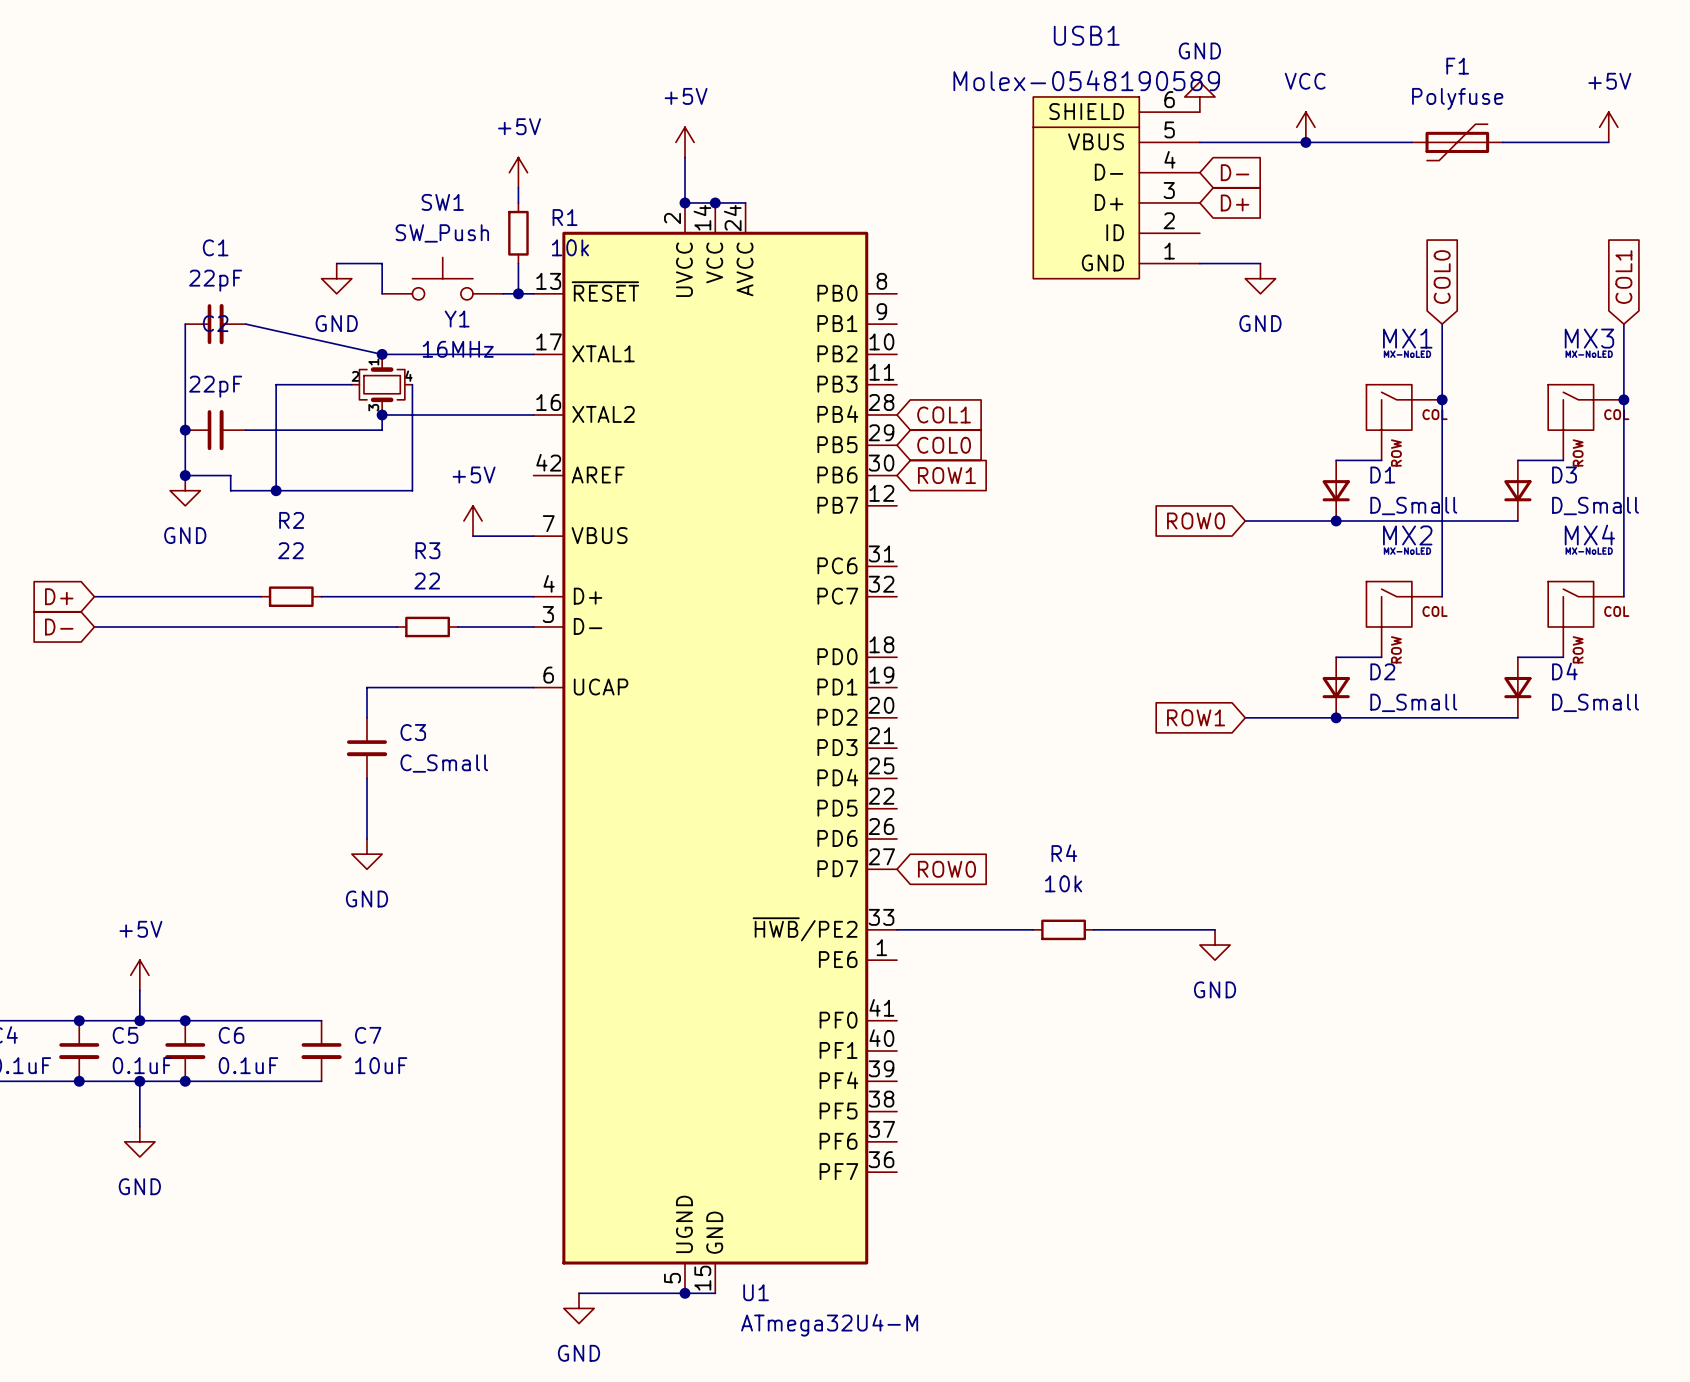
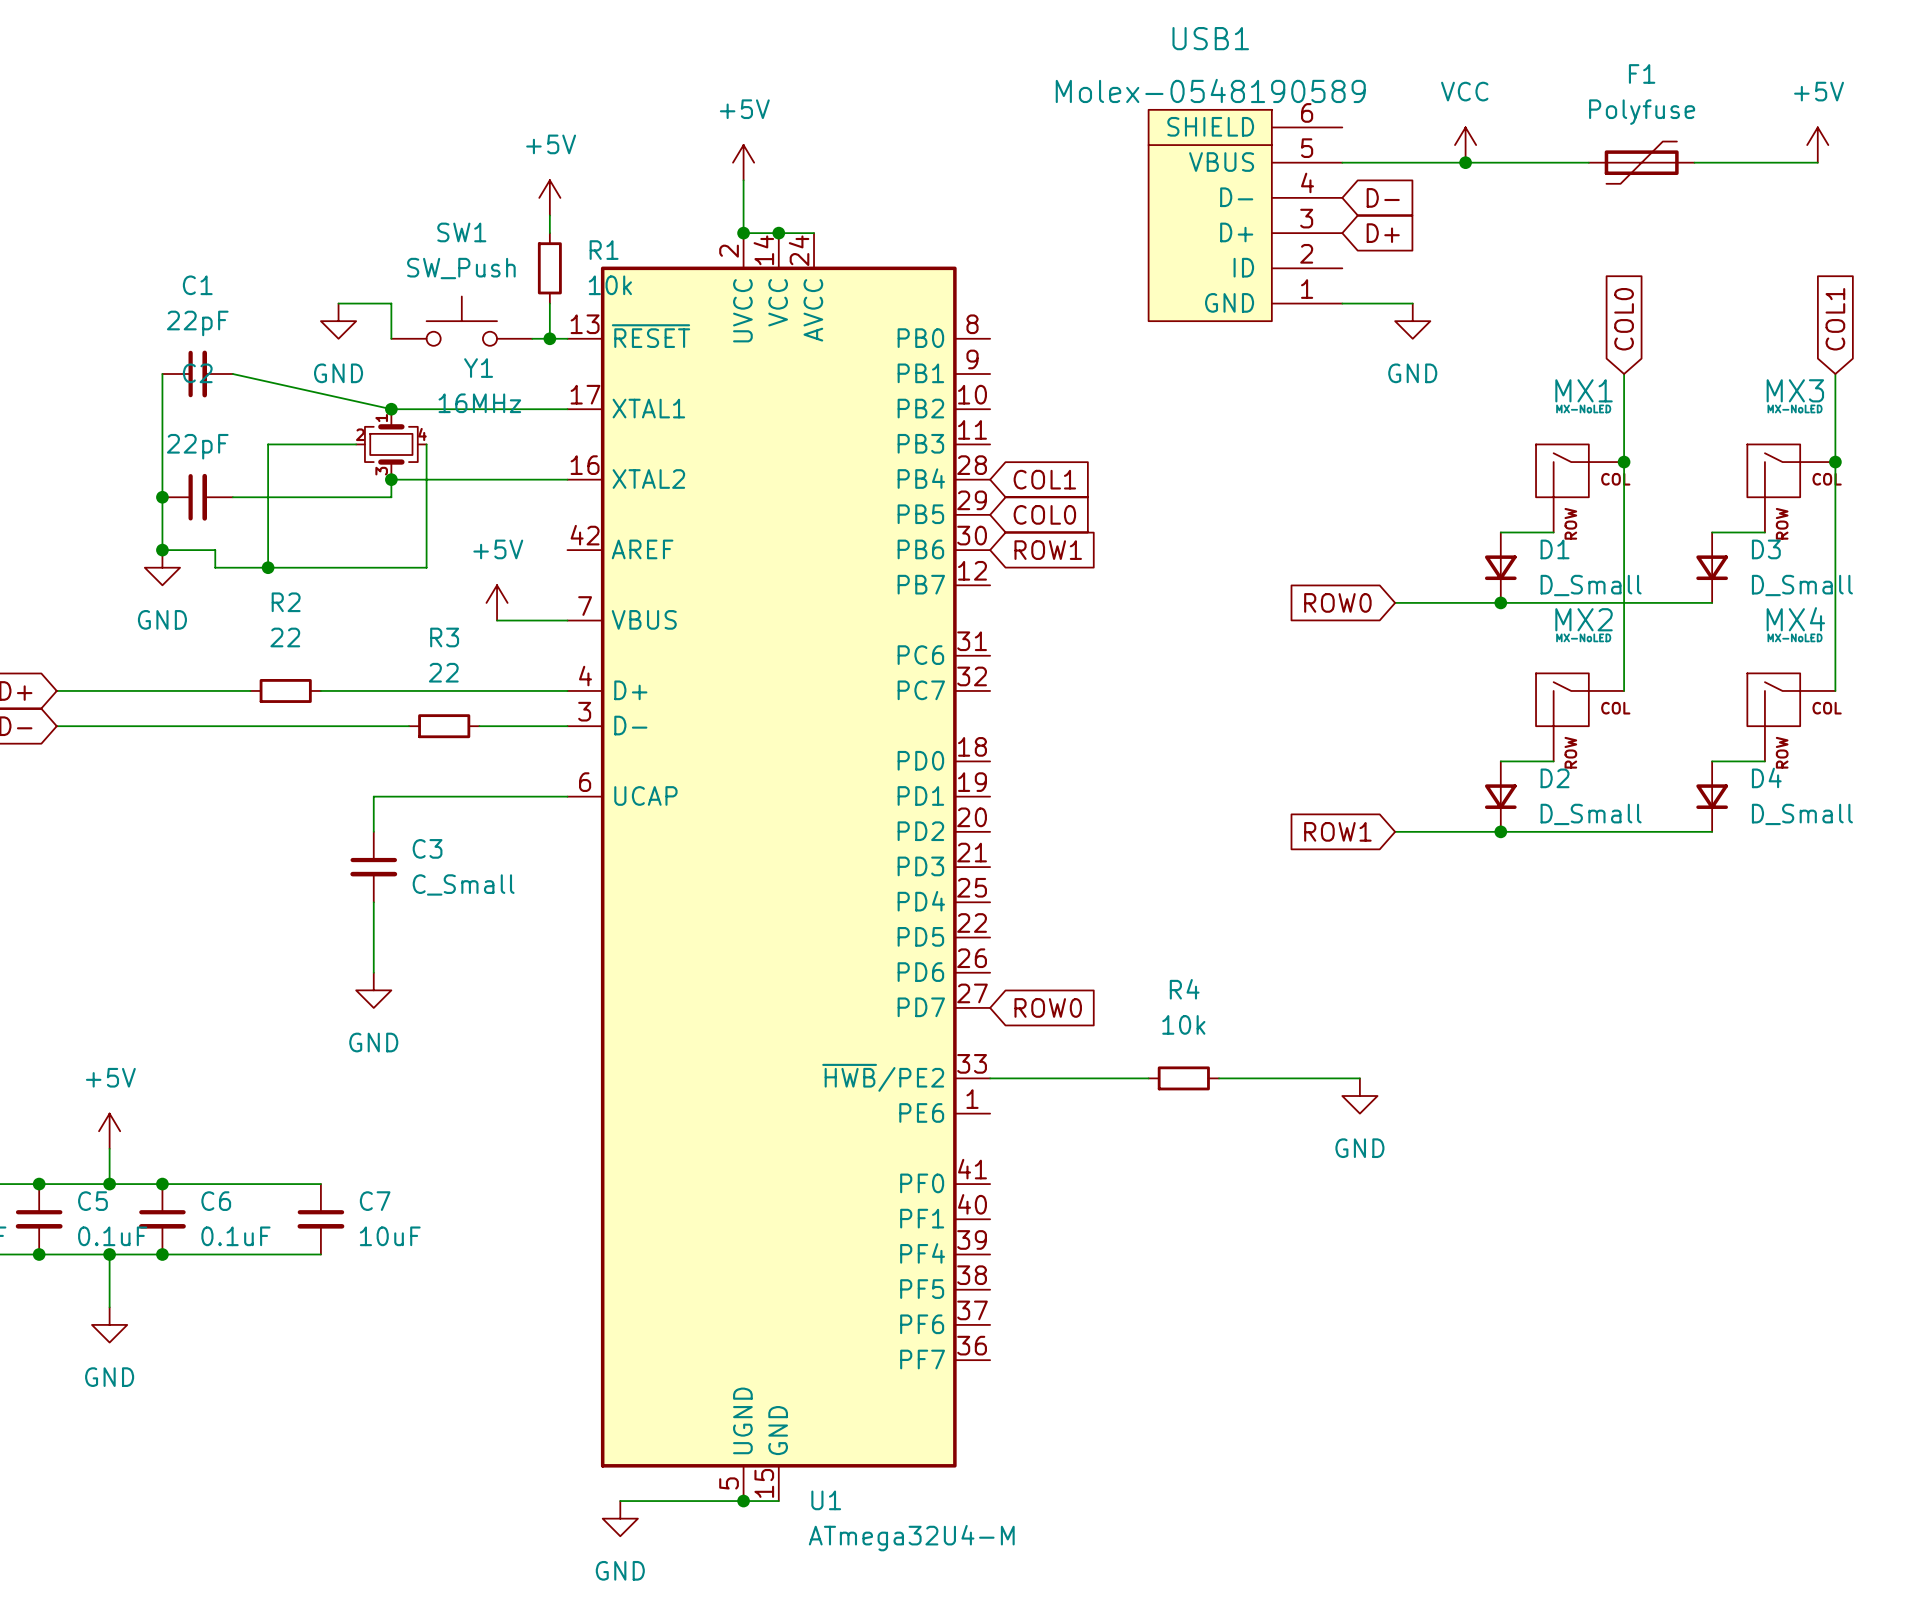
power symbol: GND (1199, 96) -> none

